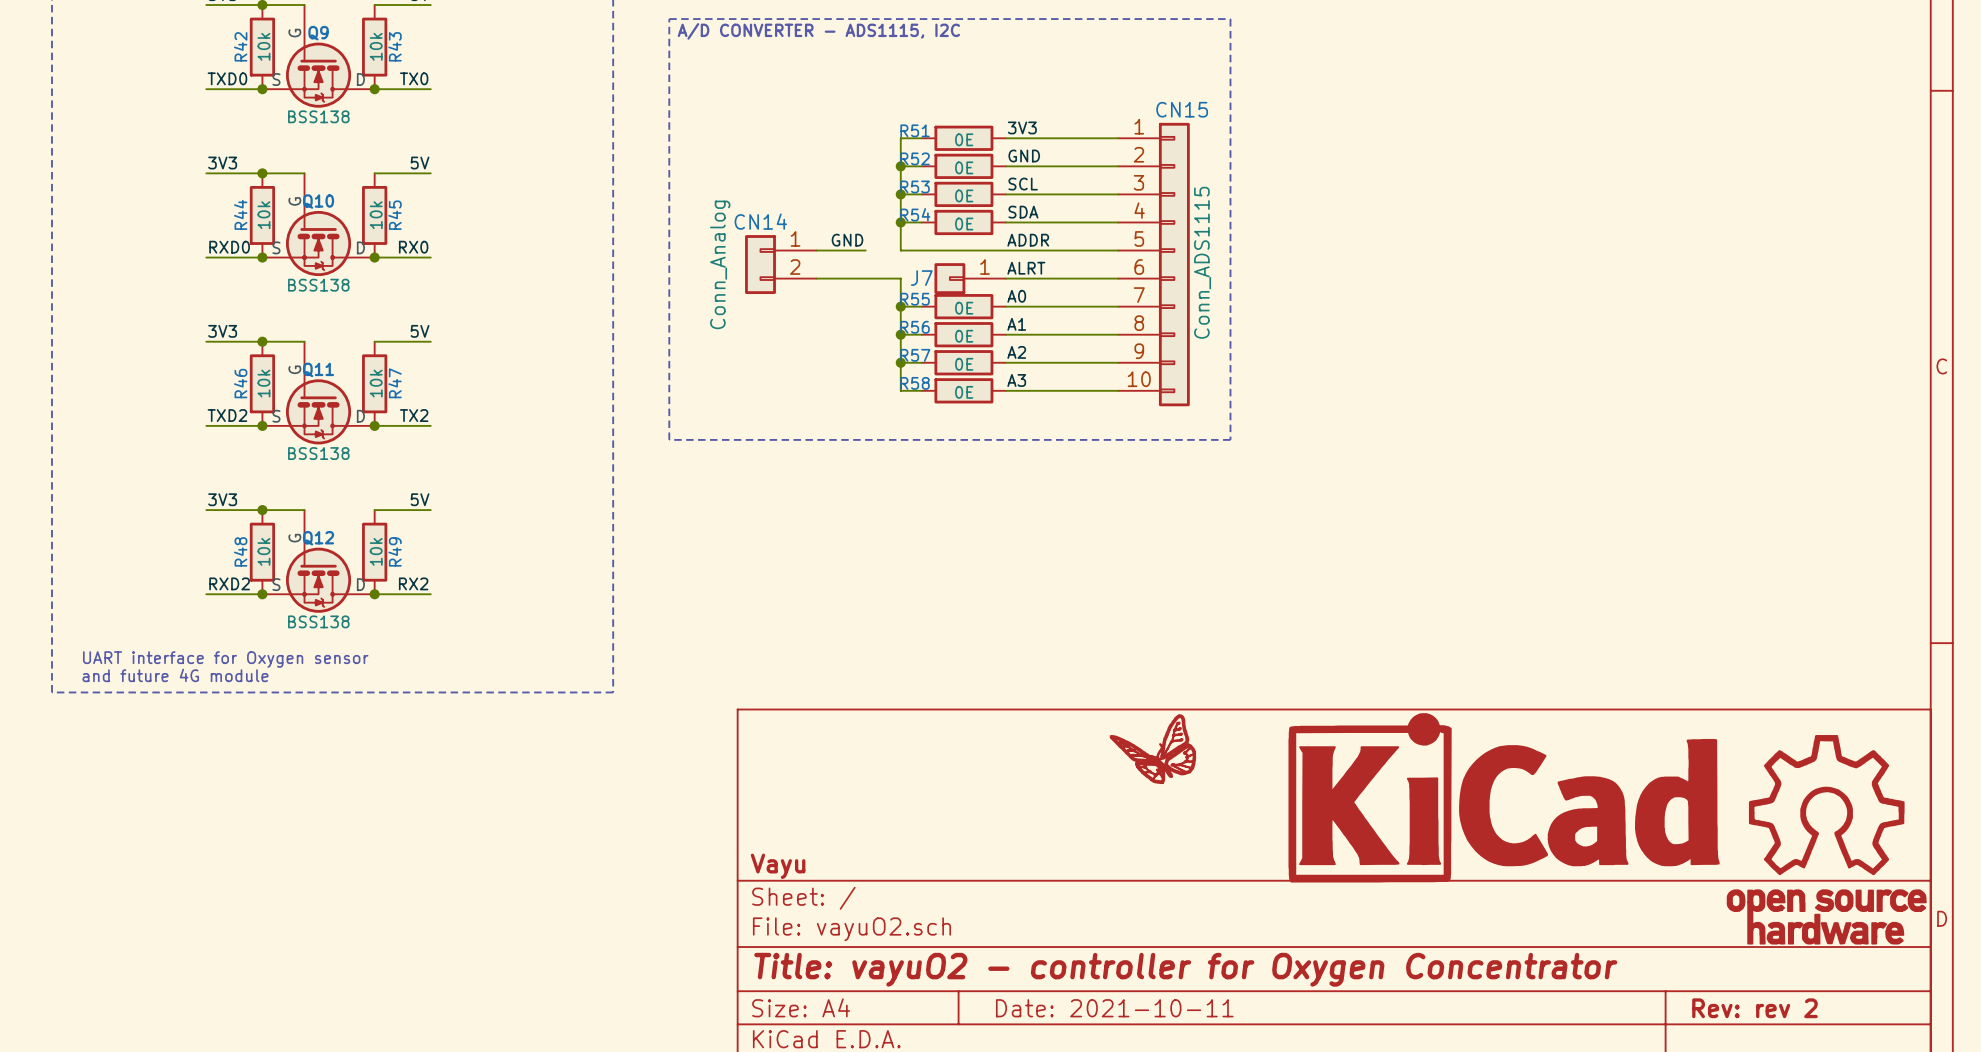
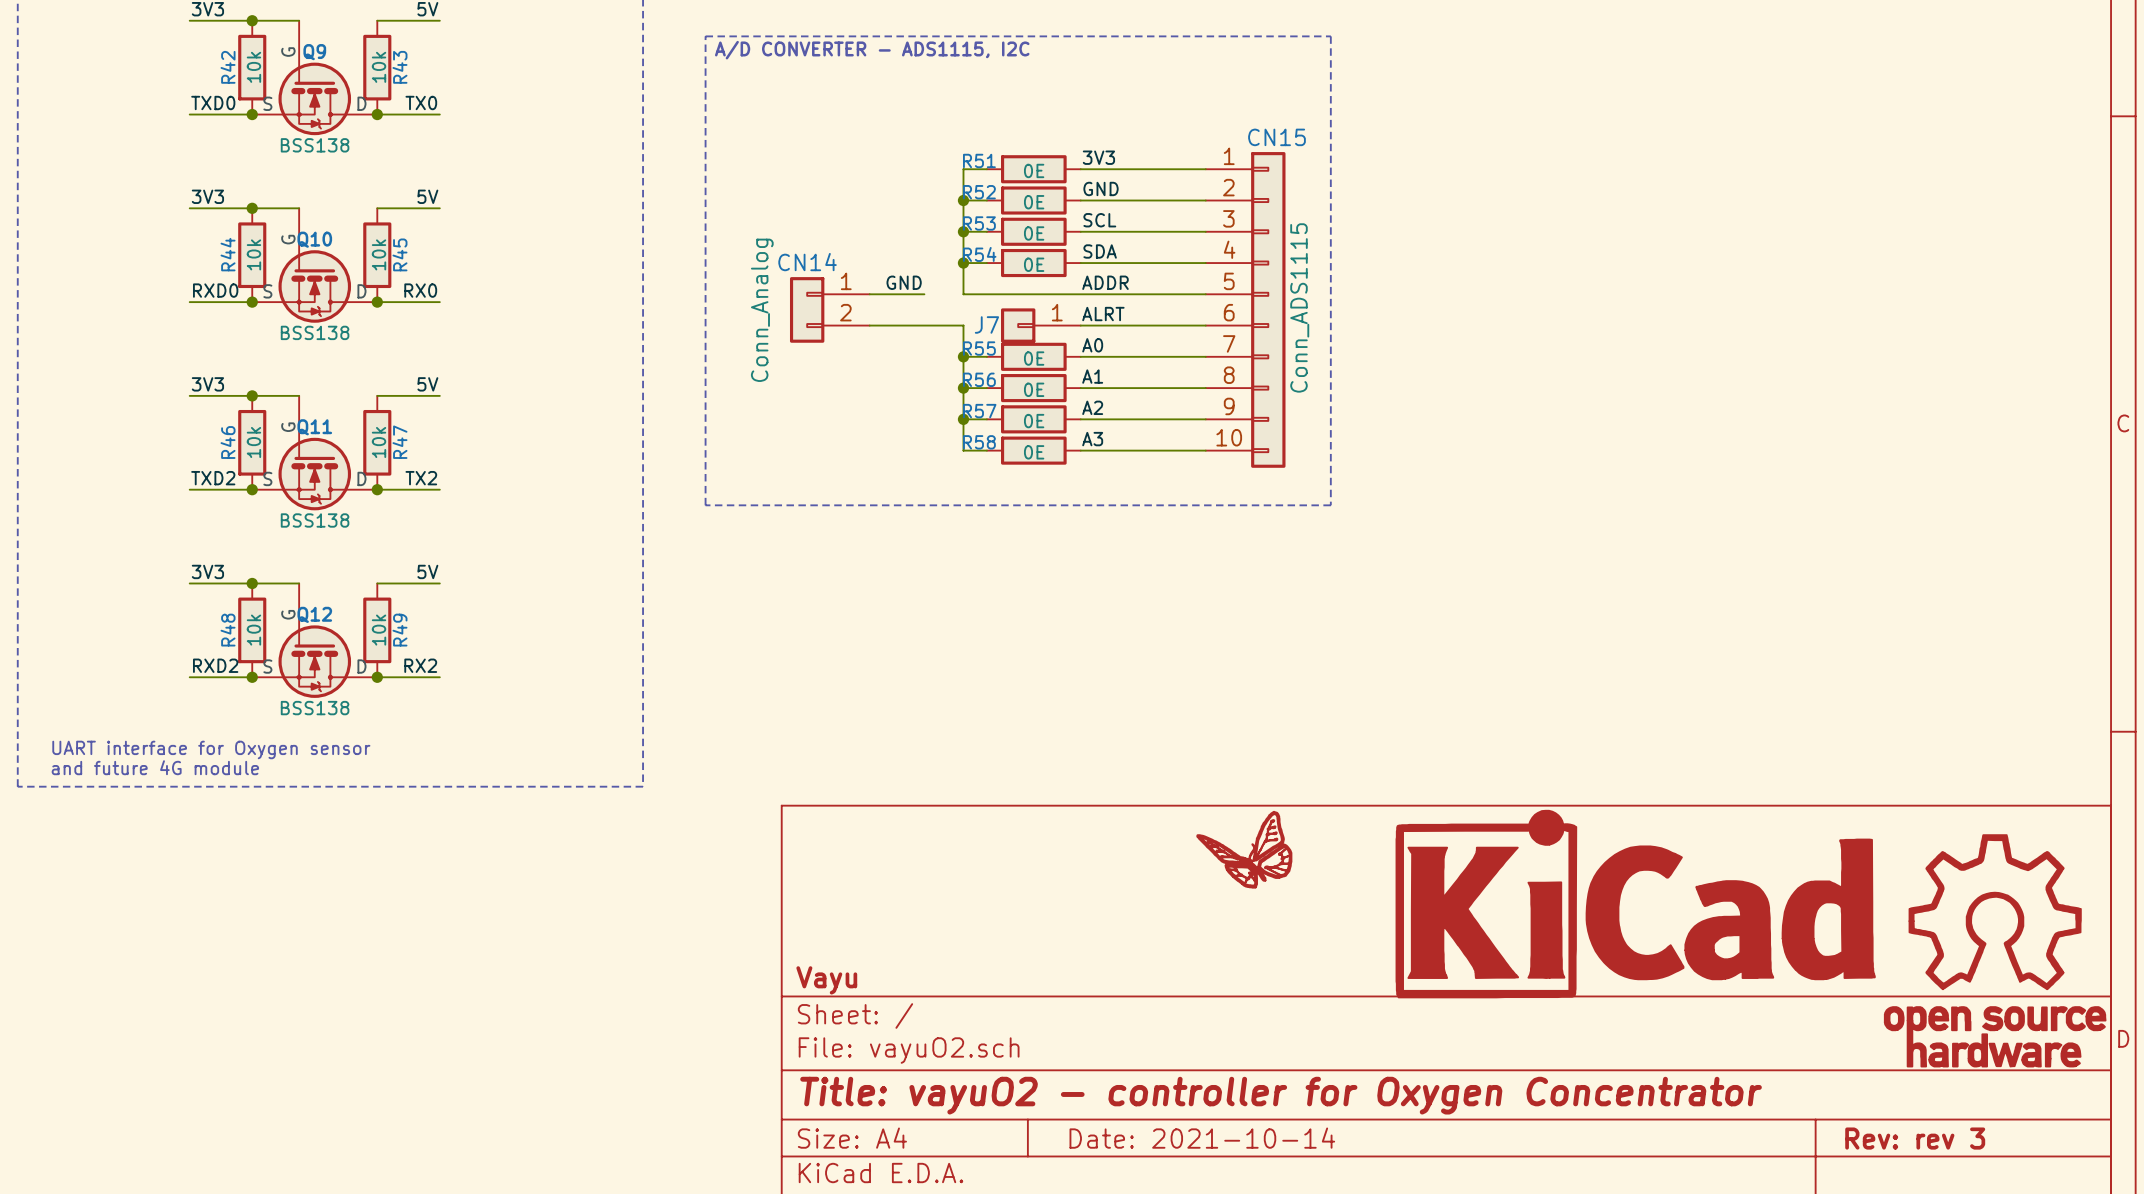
title block: Date: 2021-10-11 (1114, 1008) -> Date: 2021-10-14 (1202, 1138)
title block: Rev: rev 2 (1754, 1008) -> Rev: rev 3 (1915, 1138)

